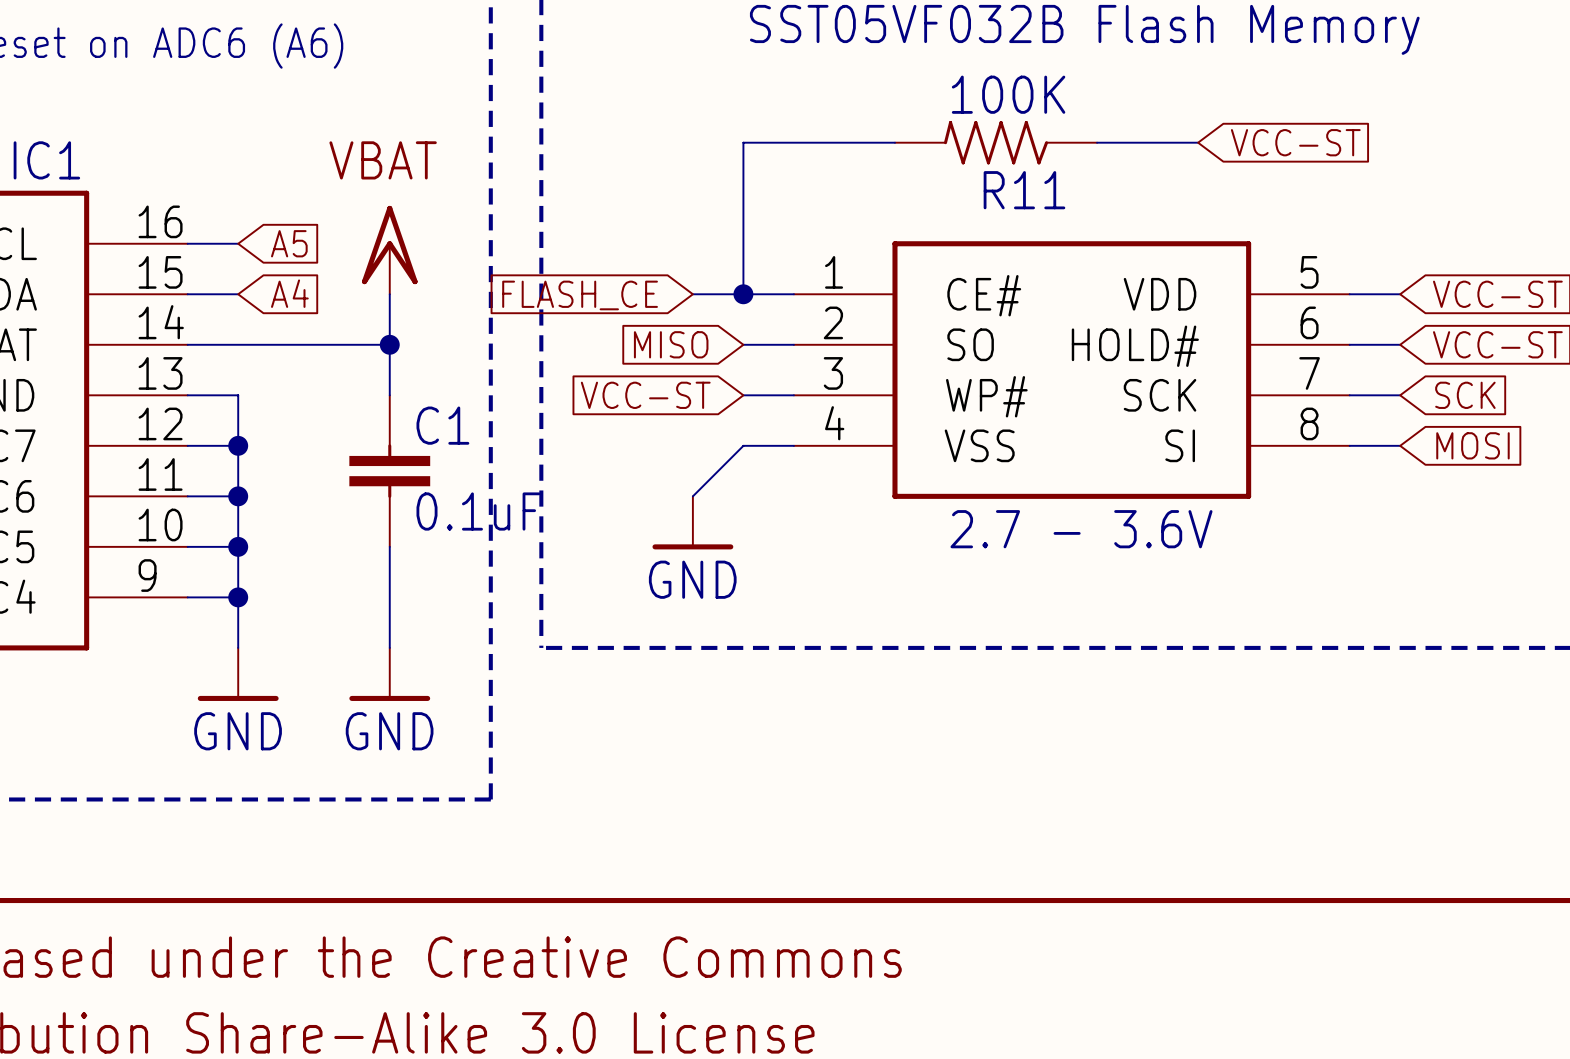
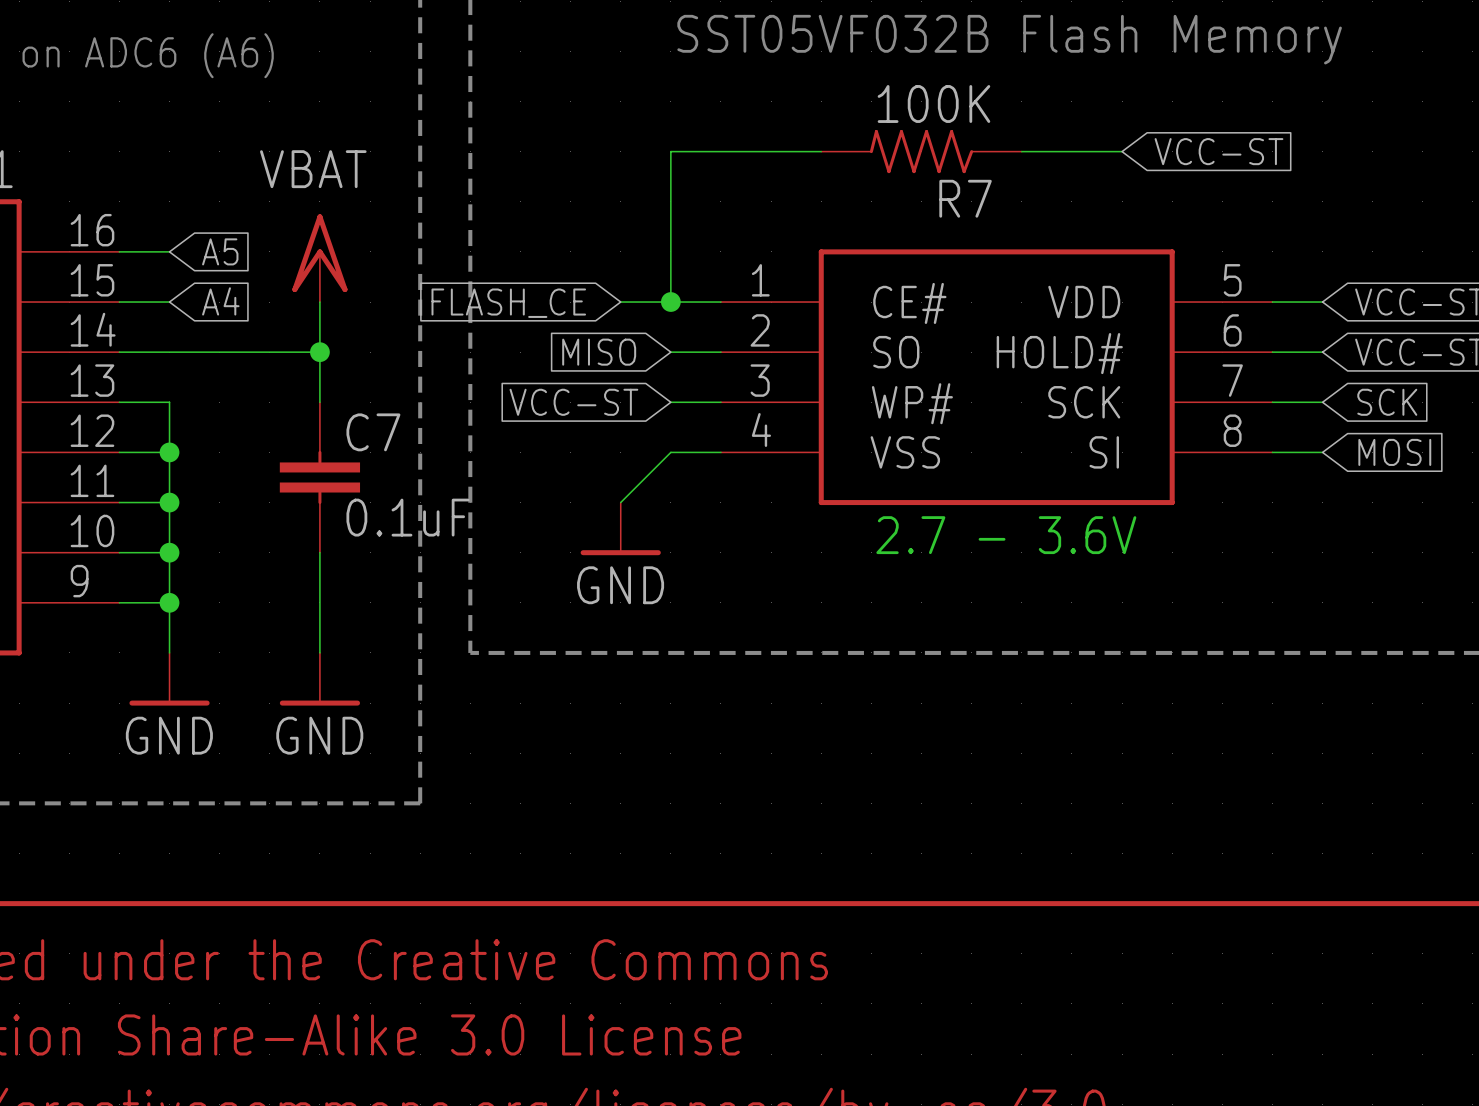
R11 name: R11 (1024, 190) -> R7 (965, 198)
C1 name: C1 (442, 425) -> C7 (373, 432)

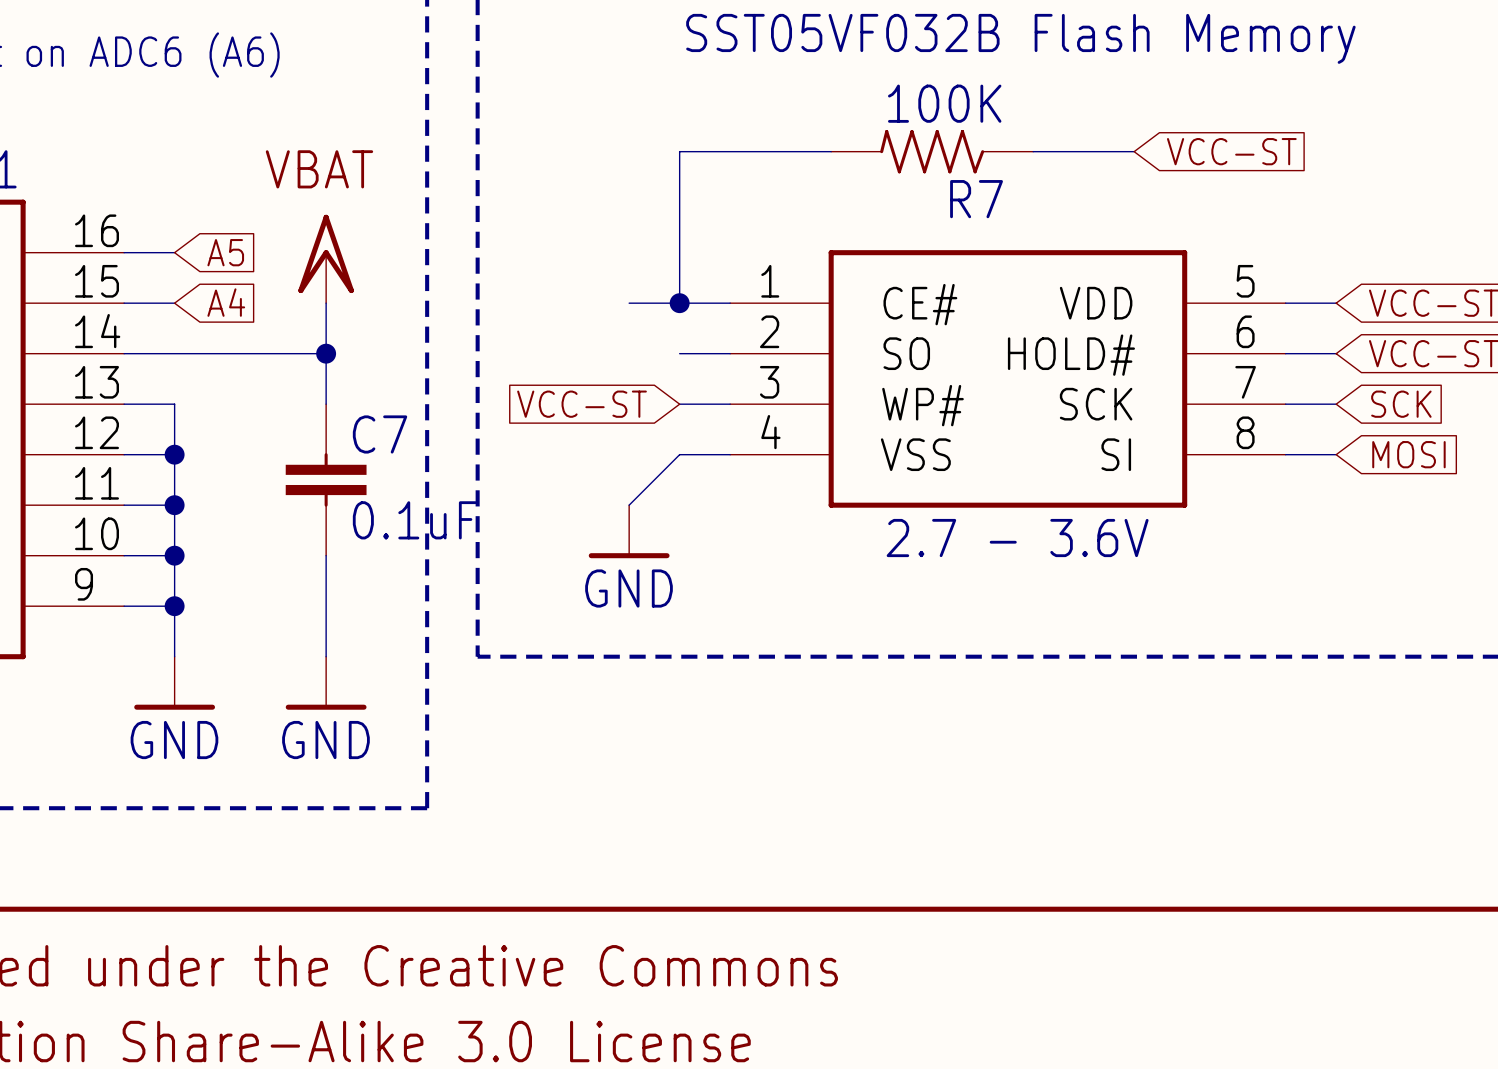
global label: FLASH_CE (508, 303) -> none
global label: MISO (599, 352) -> none

